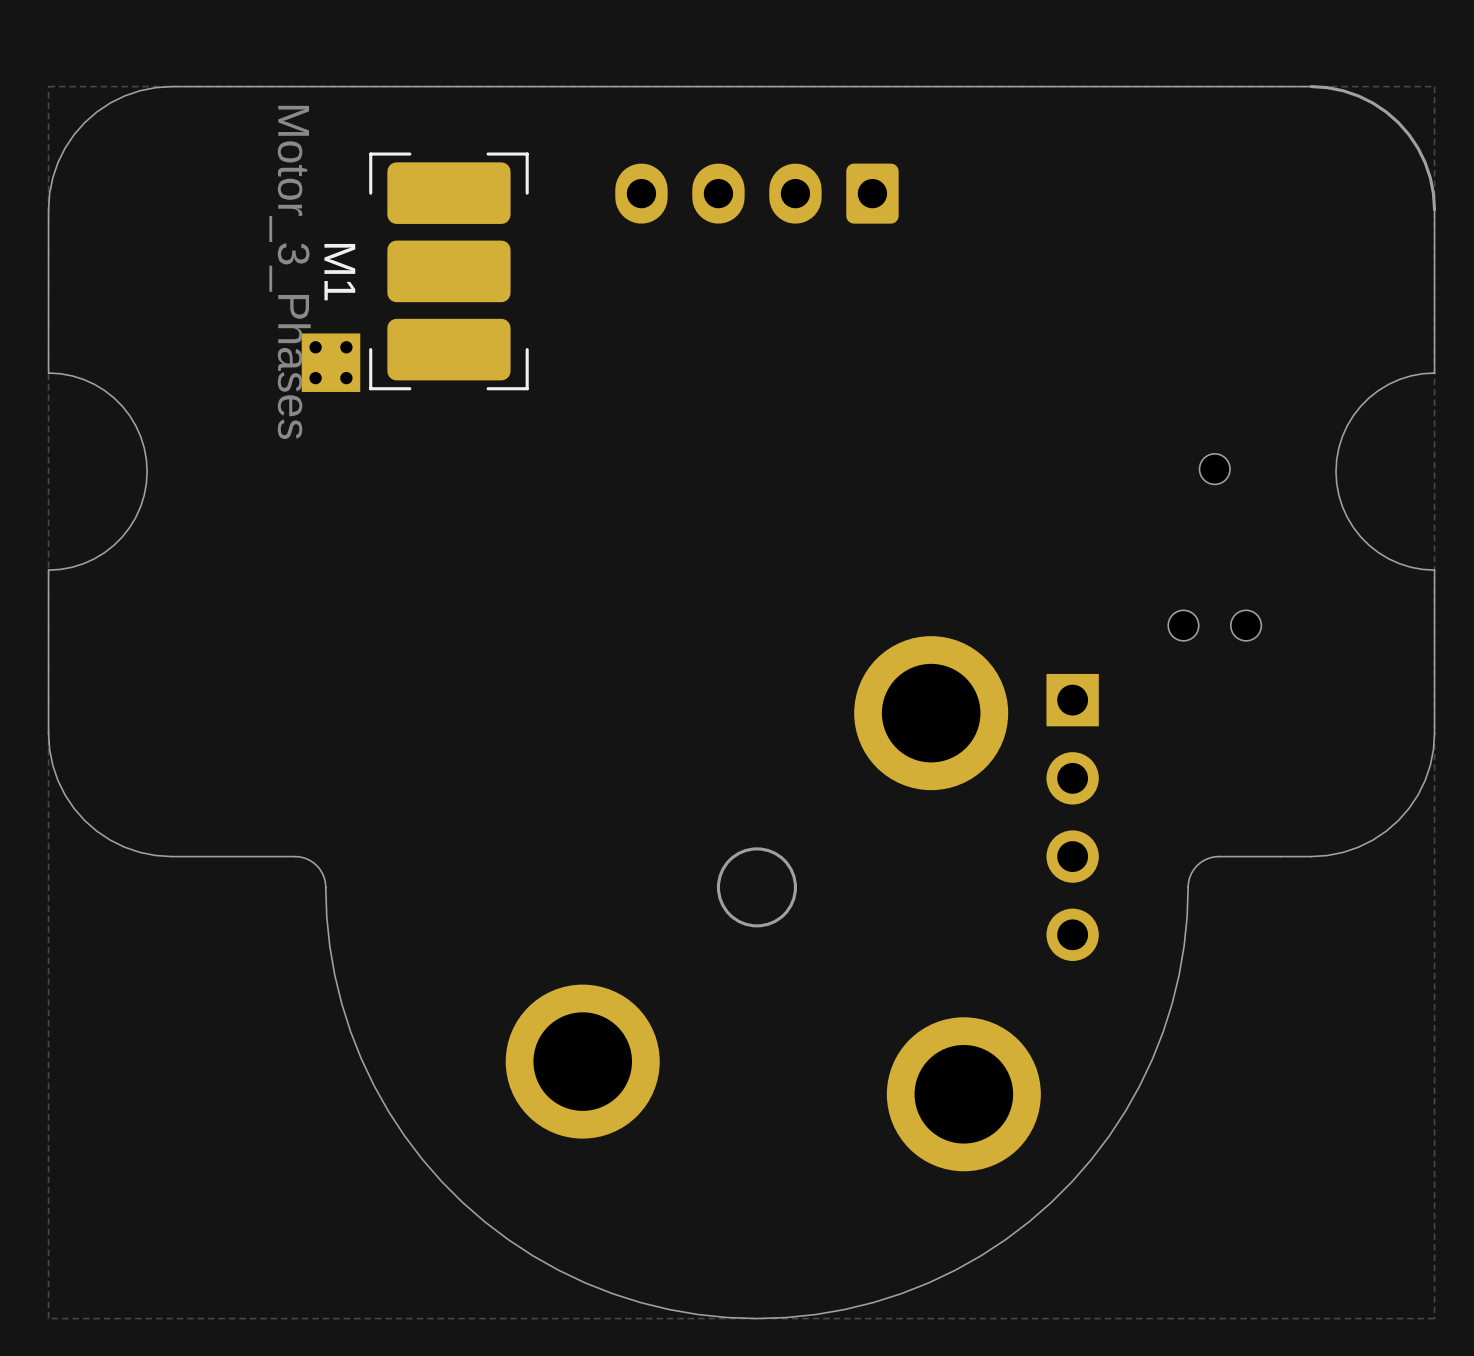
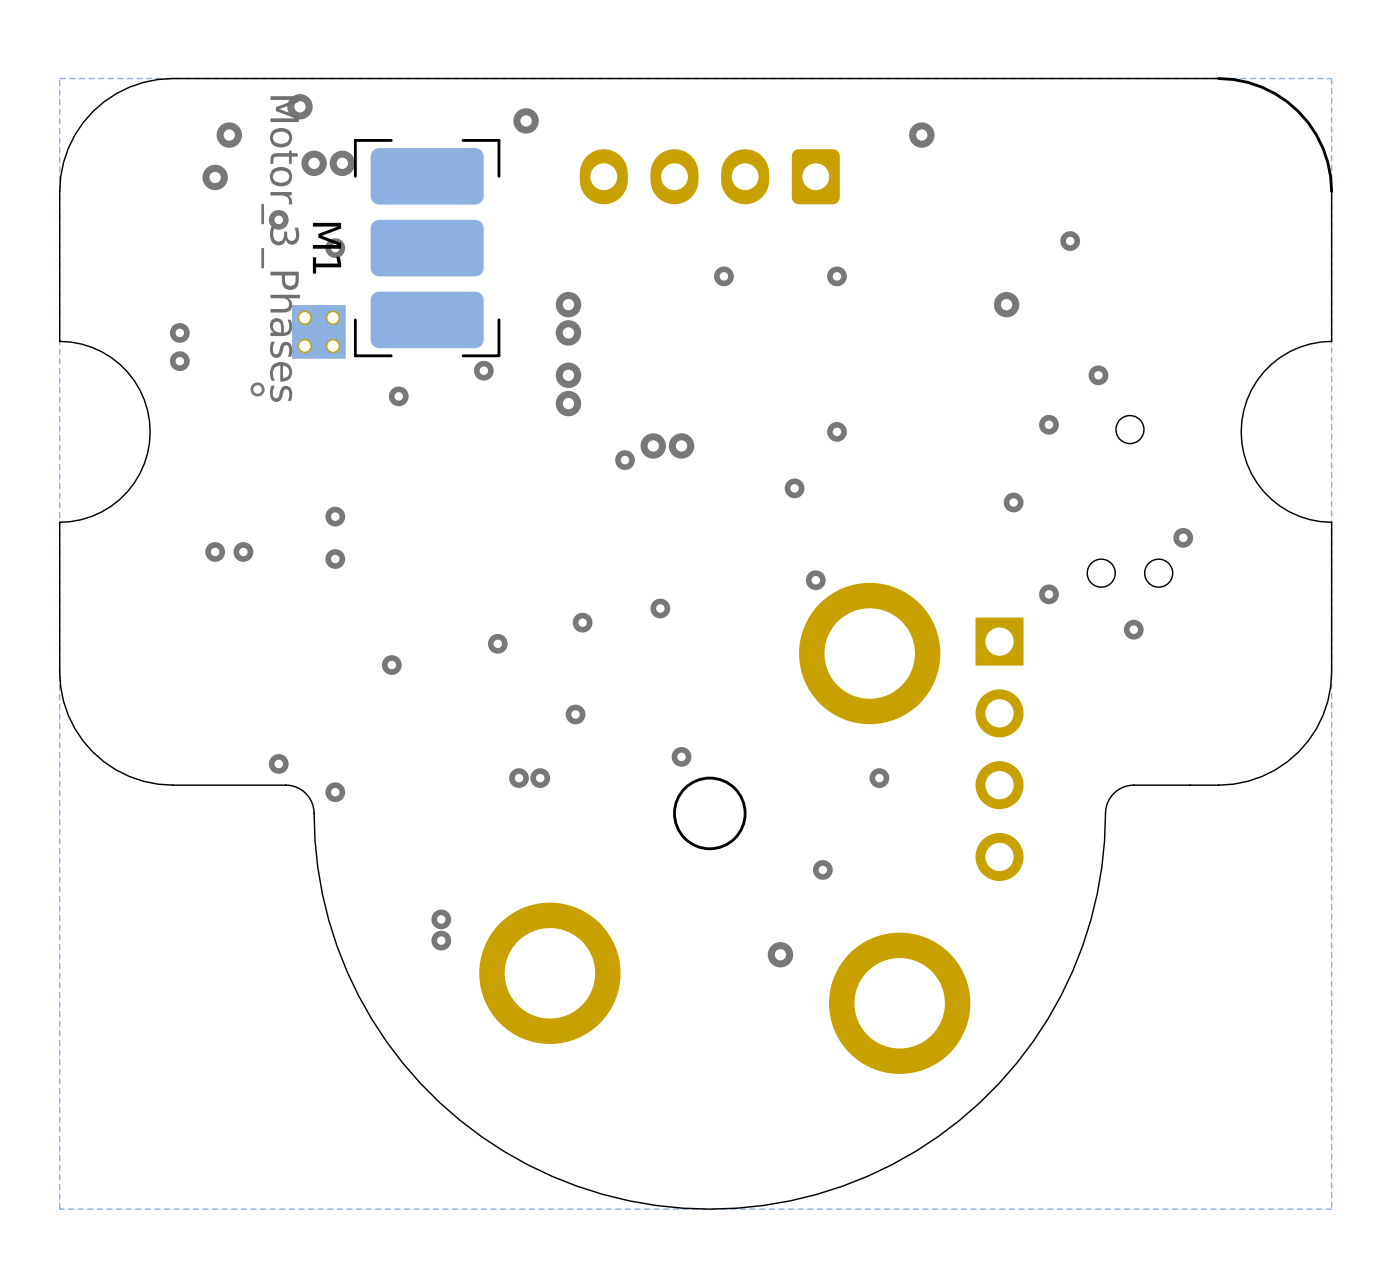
via: none -> (299, 106)
via: none -> (526, 120)
via: none -> (229, 135)
via: none -> (921, 135)
via: none -> (314, 163)
via: none -> (342, 163)
via: none -> (215, 177)
via: none -> (278, 219)
via: none -> (1070, 241)
via: none -> (335, 248)
via: none -> (723, 276)
via: none -> (836, 276)
via: none -> (568, 304)
via: none -> (1006, 304)
via: none -> (179, 332)
via: none -> (568, 332)
via: none -> (179, 361)
via: none -> (483, 370)
via: none -> (568, 375)
via: none -> (1098, 375)
via: none -> (257, 389)
via: none -> (398, 396)
via: none -> (568, 403)
via: none -> (1048, 424)
via: none -> (836, 431)
via: none -> (653, 445)
via: none -> (681, 445)
via: none -> (625, 460)
via: none -> (794, 488)
via: none -> (1013, 502)
via: none -> (335, 516)
via: none -> (1183, 537)
via: none -> (215, 551)
via: none -> (243, 551)
via: none -> (335, 559)
via: none -> (815, 580)
via: none -> (1048, 594)
via: none -> (660, 608)
via: none -> (582, 622)
via: none -> (1133, 629)
via: none -> (497, 643)
via: none -> (391, 665)
via: none -> (575, 714)
via: none -> (681, 756)
via: none -> (278, 763)
via: none -> (519, 778)
via: none -> (540, 778)
via: none -> (879, 778)
via: none -> (335, 792)
via: none -> (822, 869)
via: none -> (441, 919)
via: none -> (441, 940)
via: none -> (780, 954)

